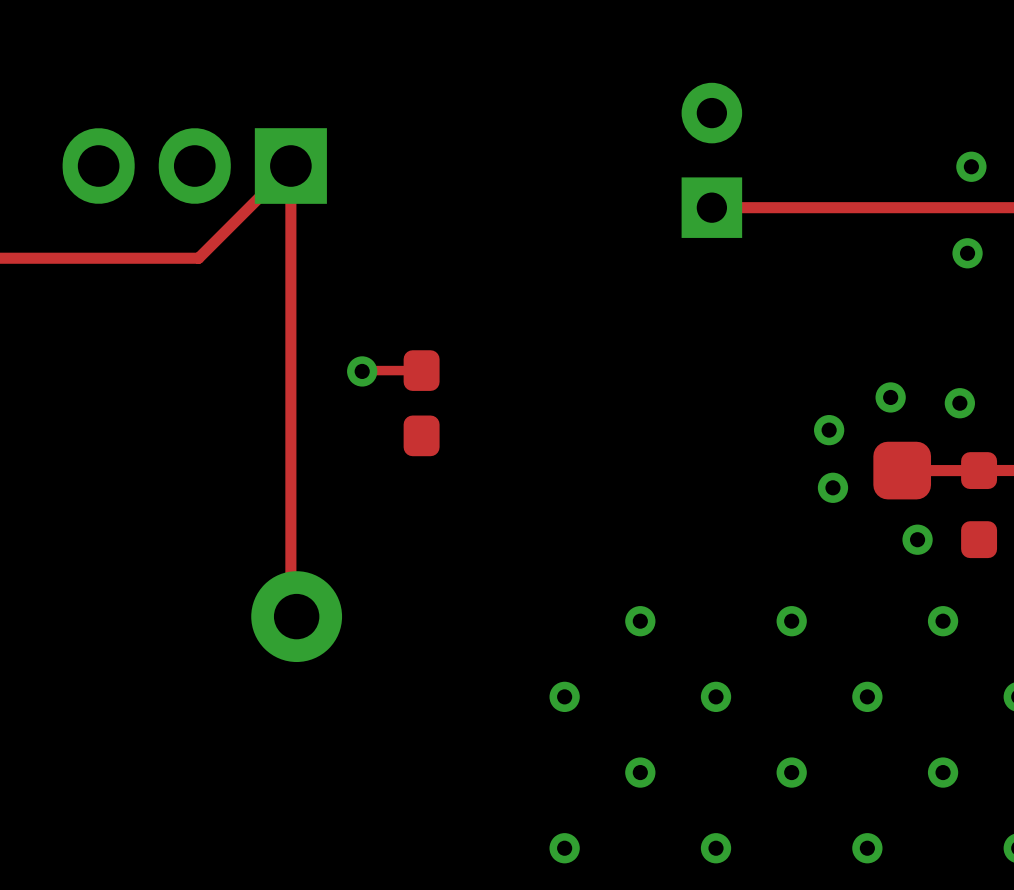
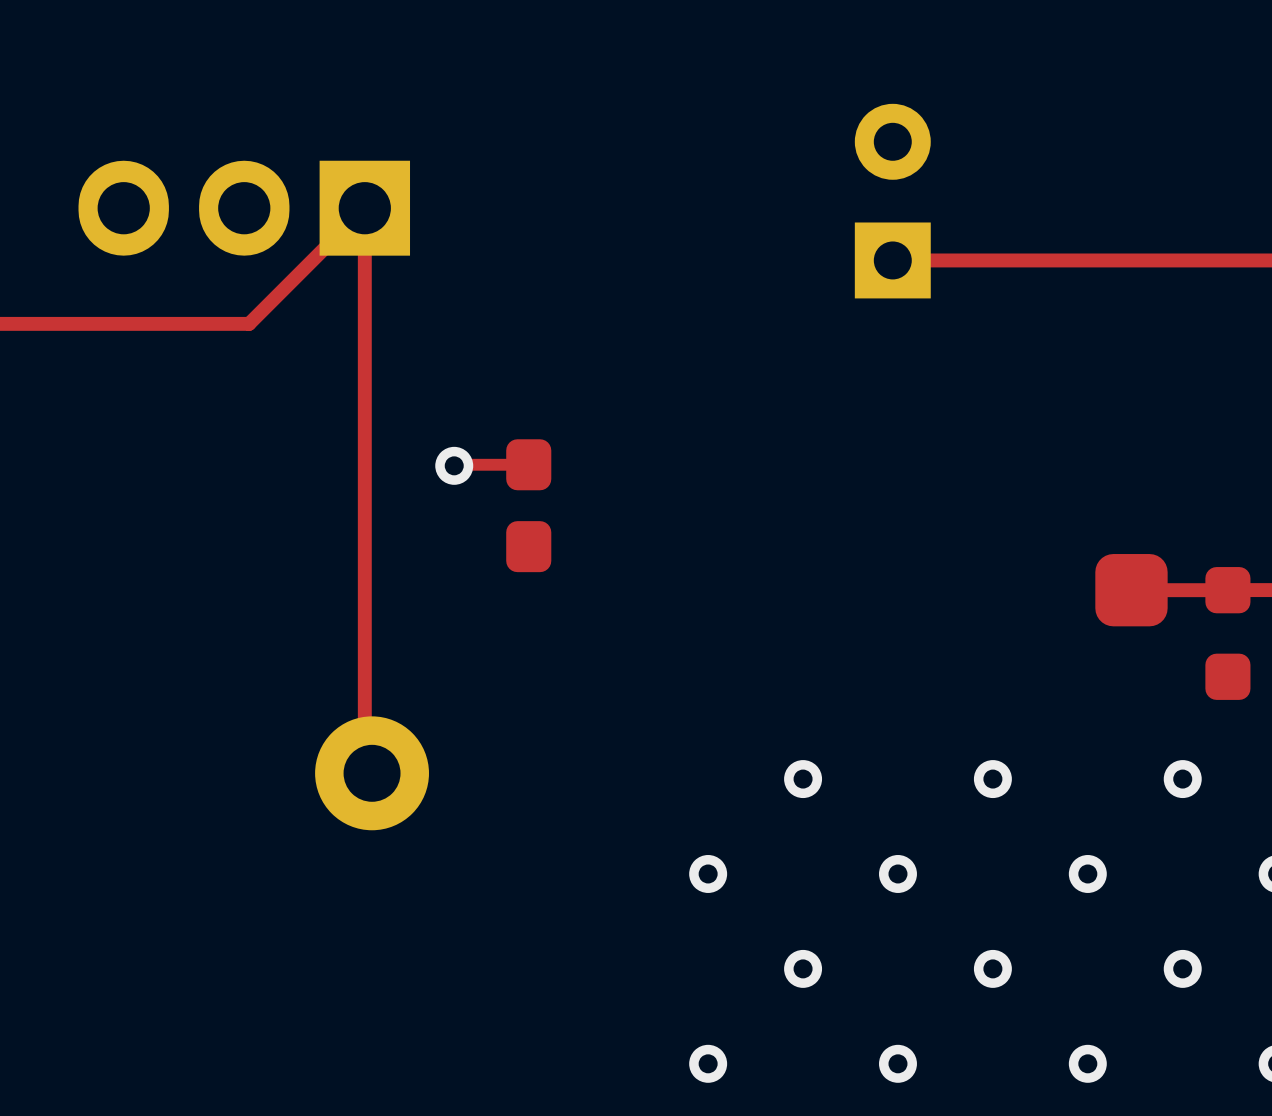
via: (971, 166) -> none
via: (967, 253) -> none
via: (890, 397) -> none
via: (959, 403) -> none
via: (829, 430) -> none
via: (832, 487) -> none
via: (917, 539) -> none

